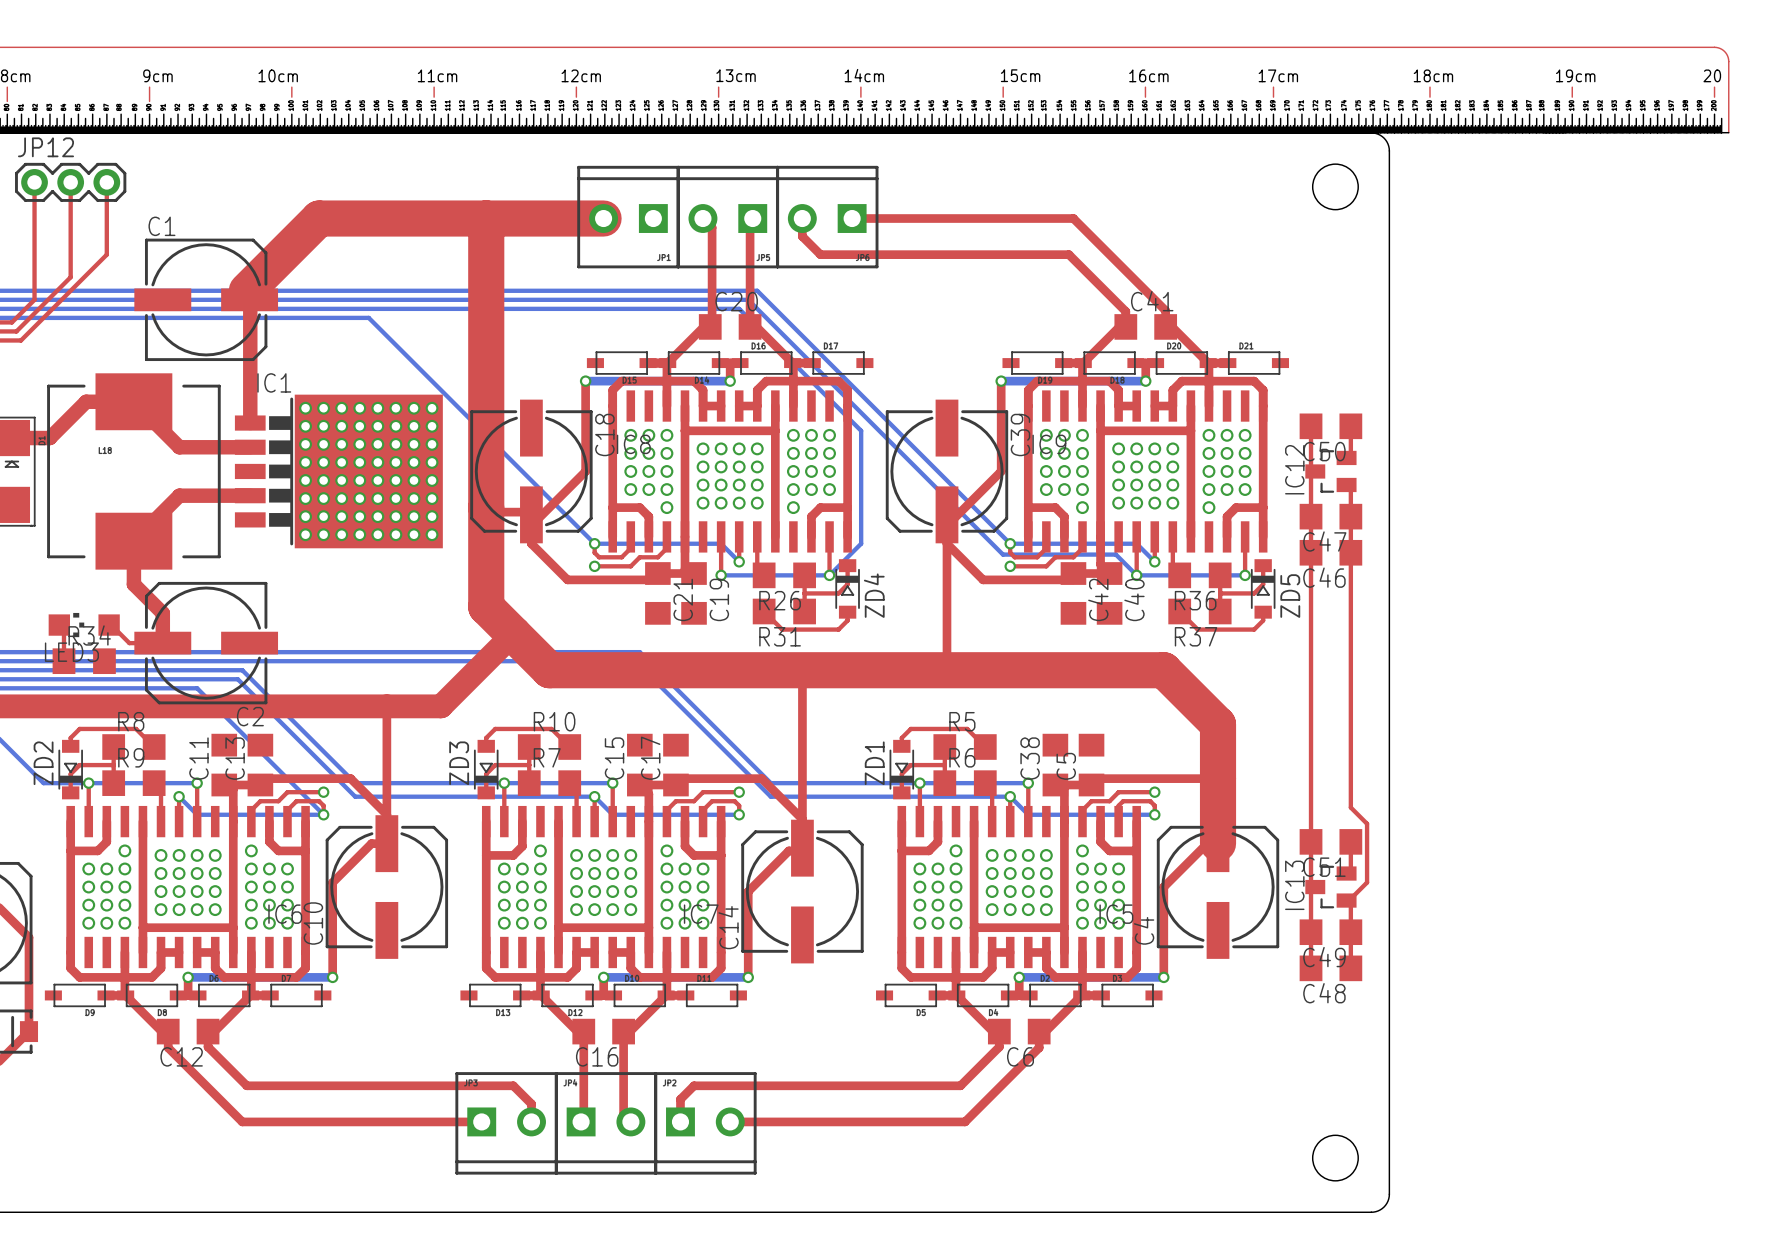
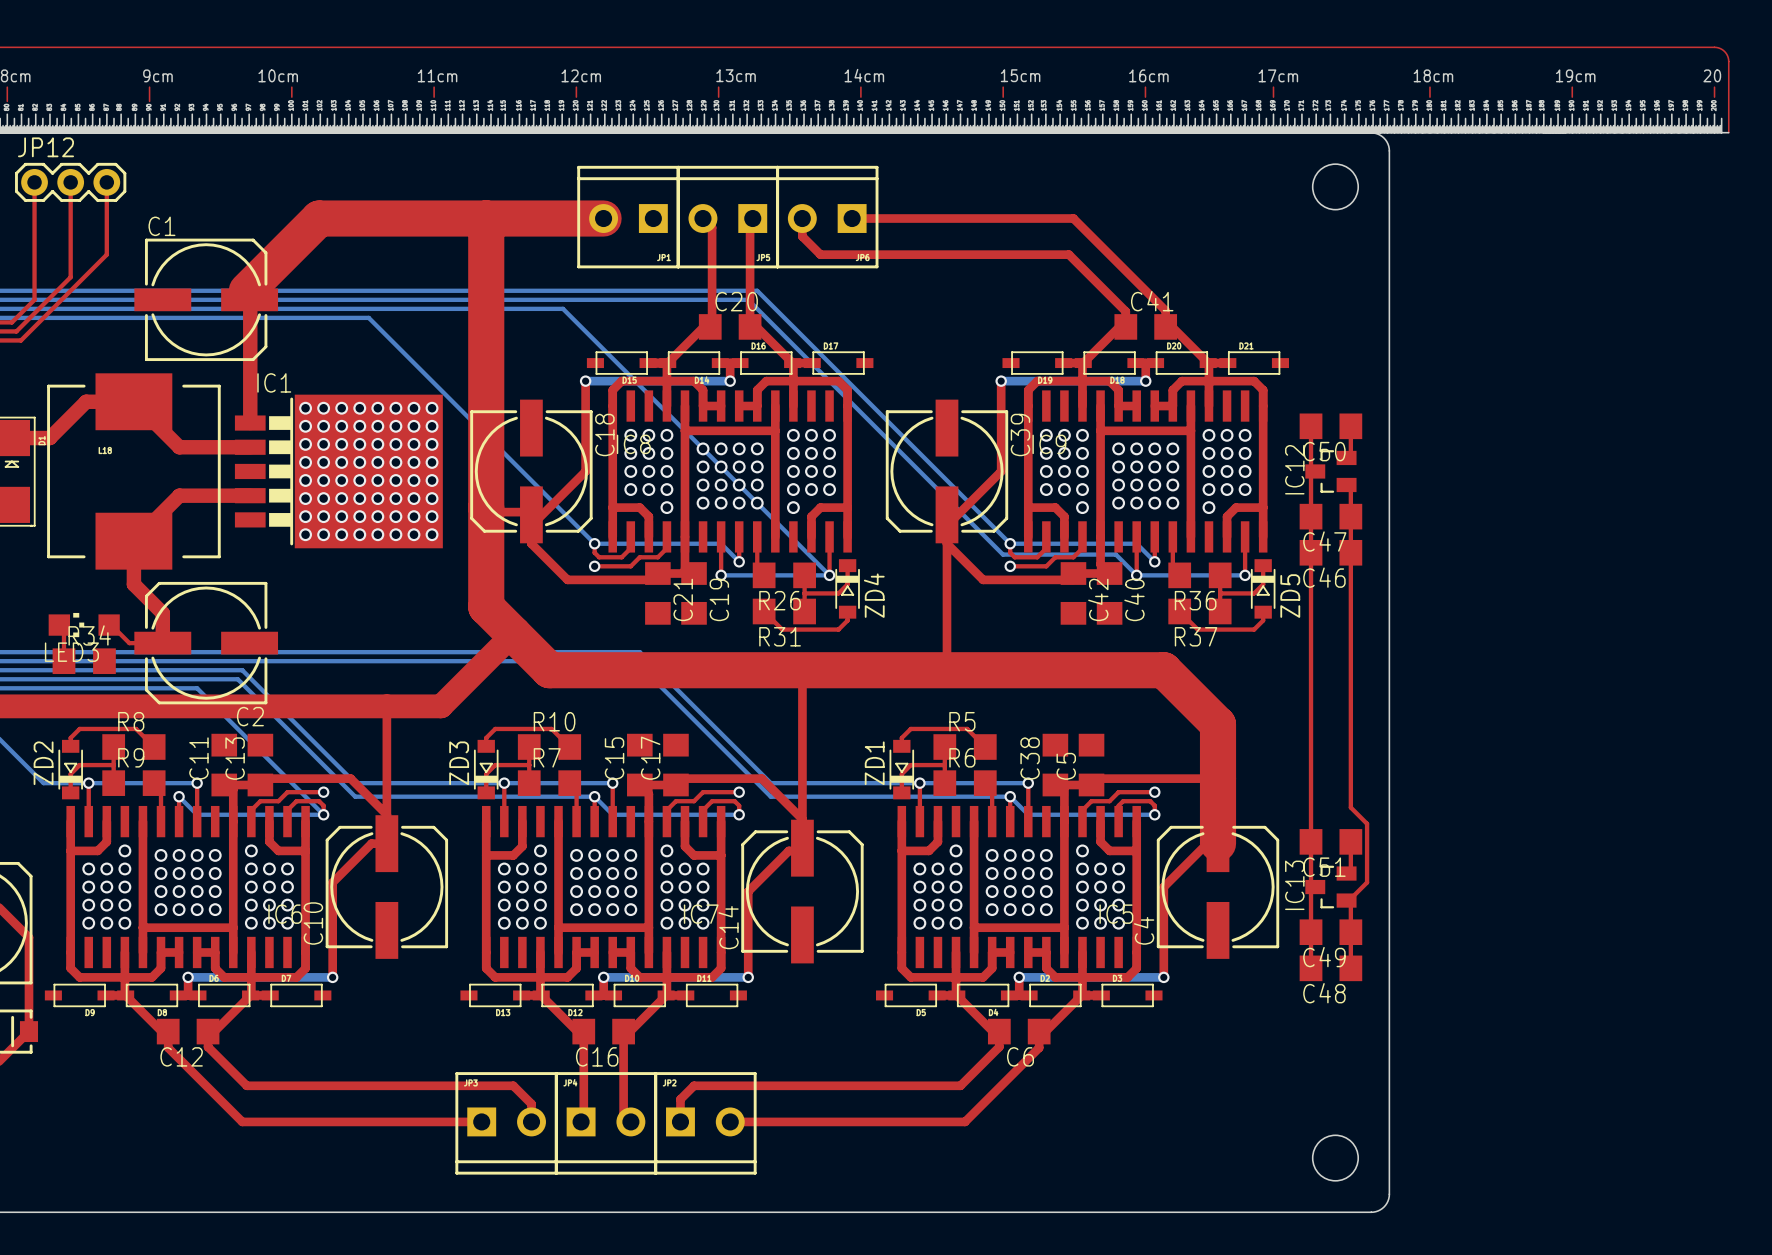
bottom track: (563, 308) (739, 308) (861, 430) (861, 543) (829, 575) -> (563, 308) (829, 575)

